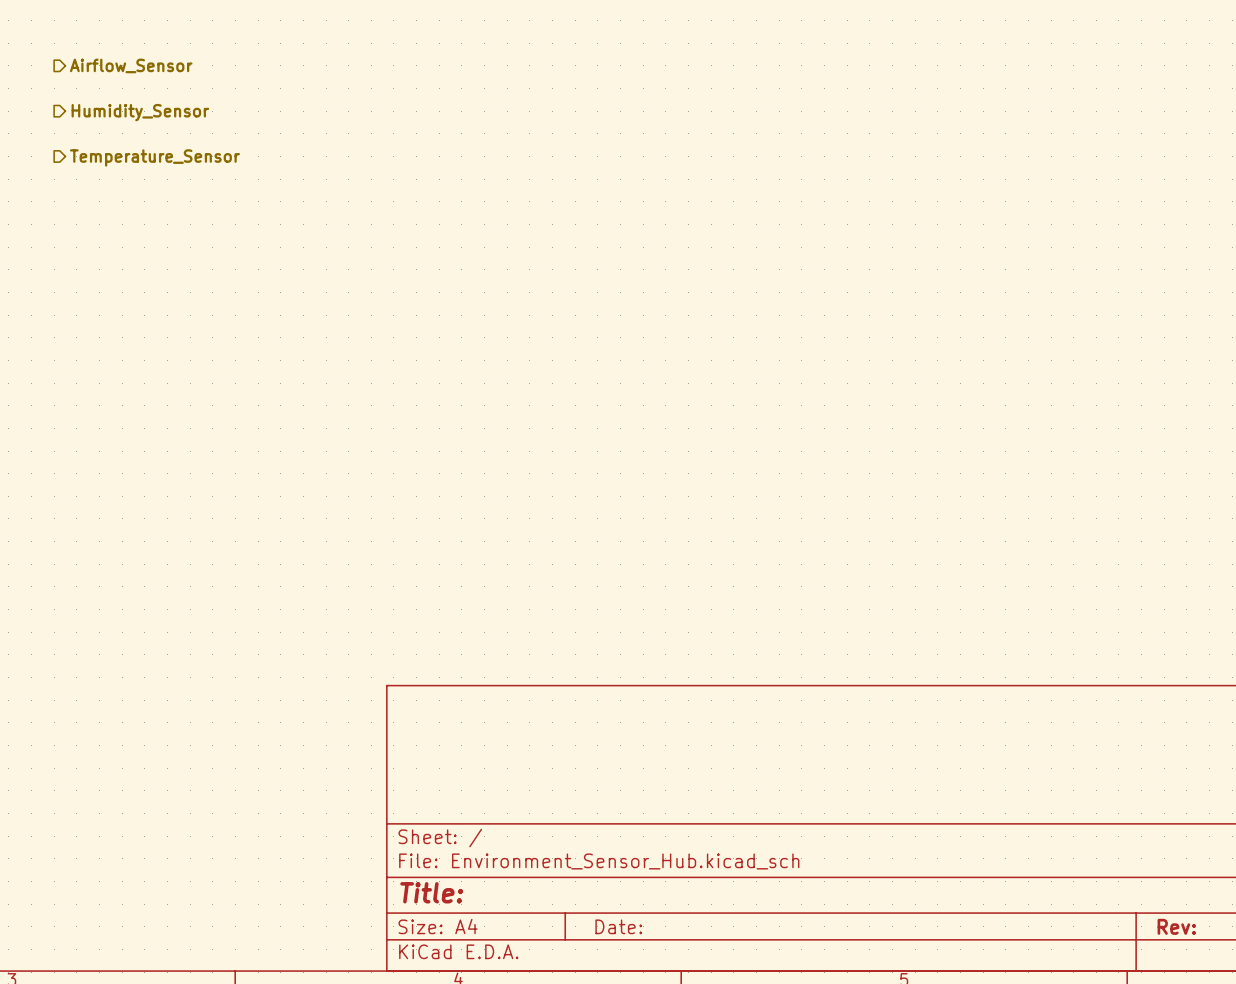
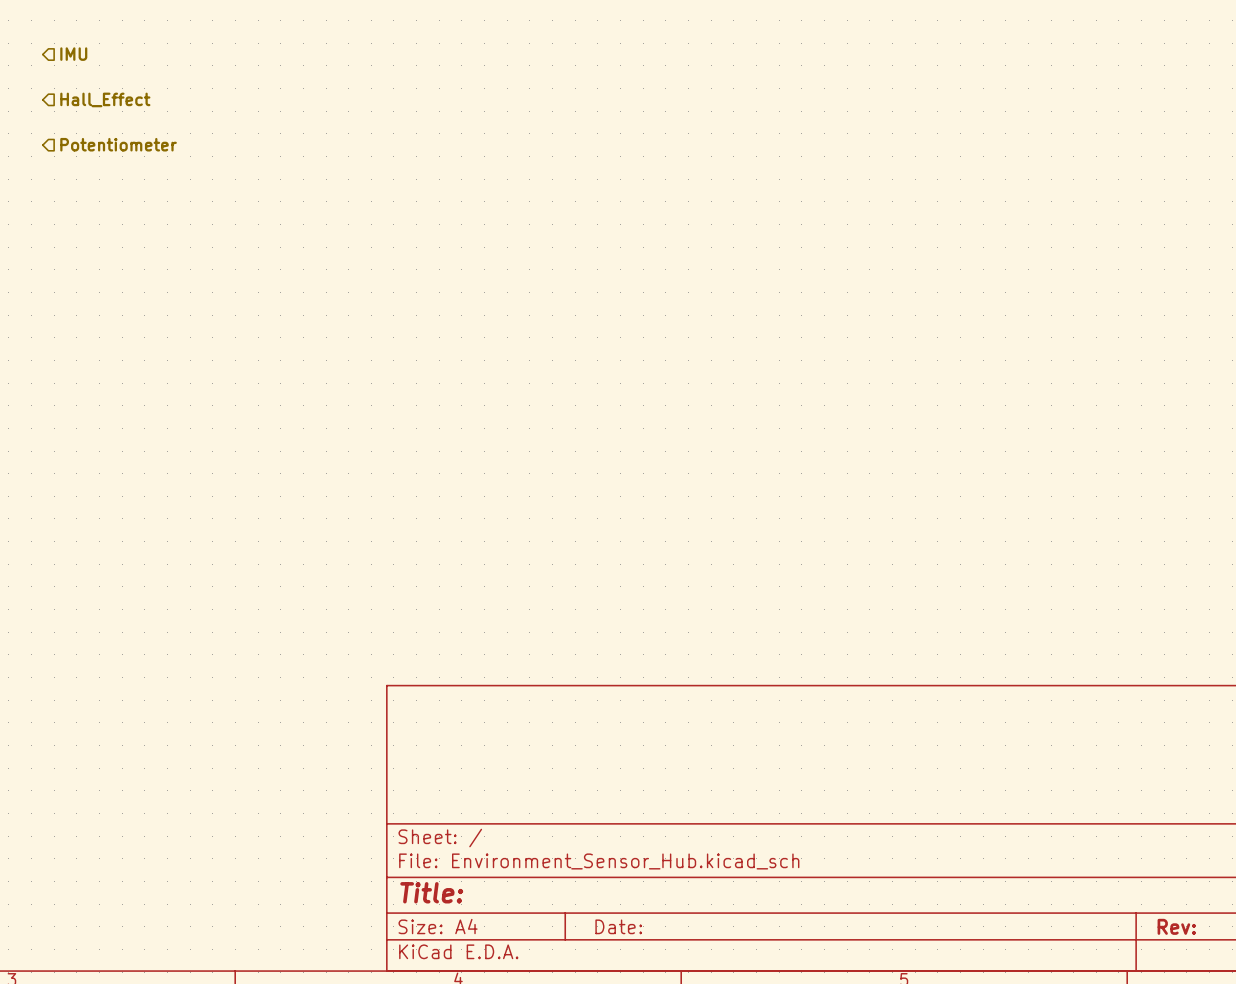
hierarchical label: none -> IMU (73, 54)
hierarchical label: Airflow_Sensor (131, 65) -> none
hierarchical label: none -> Hall_Effect (105, 99)
hierarchical label: Humidity_Sensor (140, 112) -> none
hierarchical label: none -> Potentiometer (118, 144)
hierarchical label: Temperature_Sensor (154, 157) -> none

